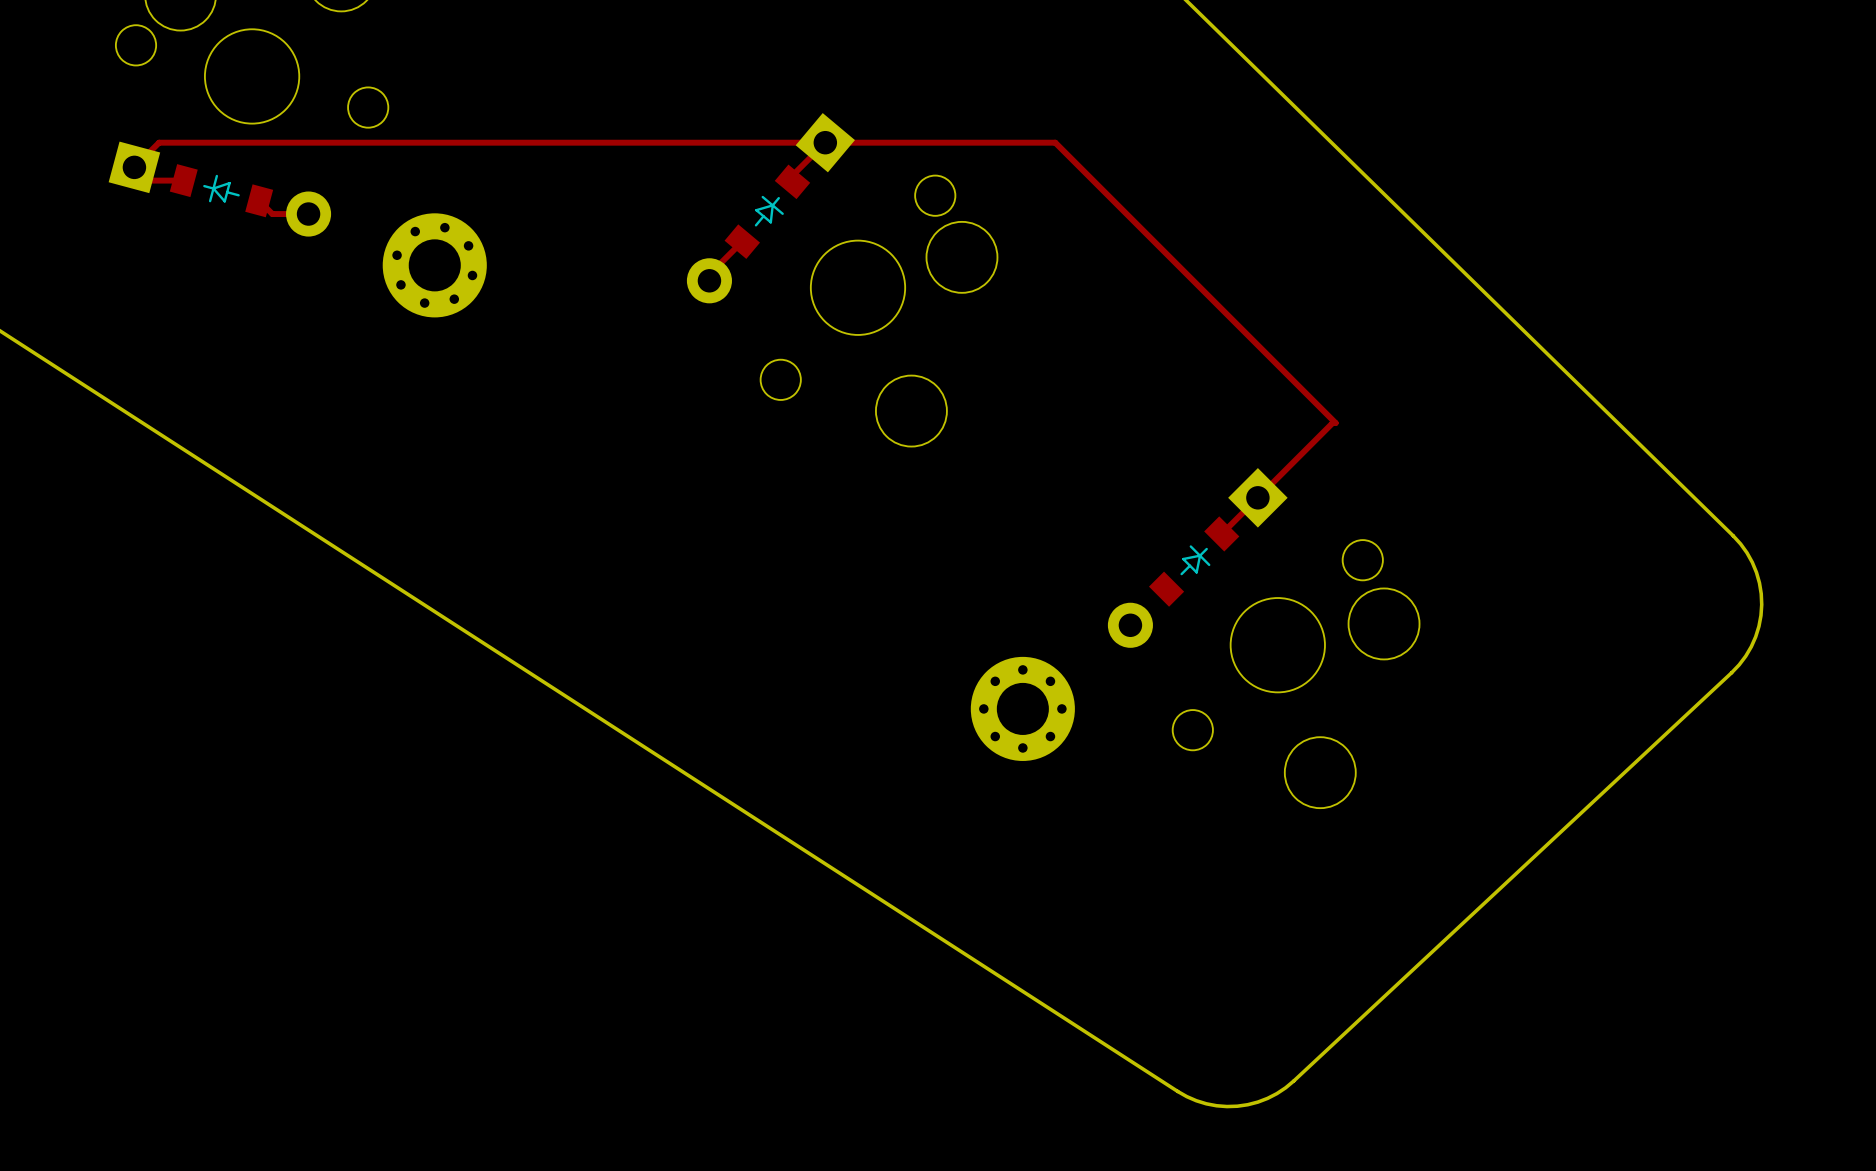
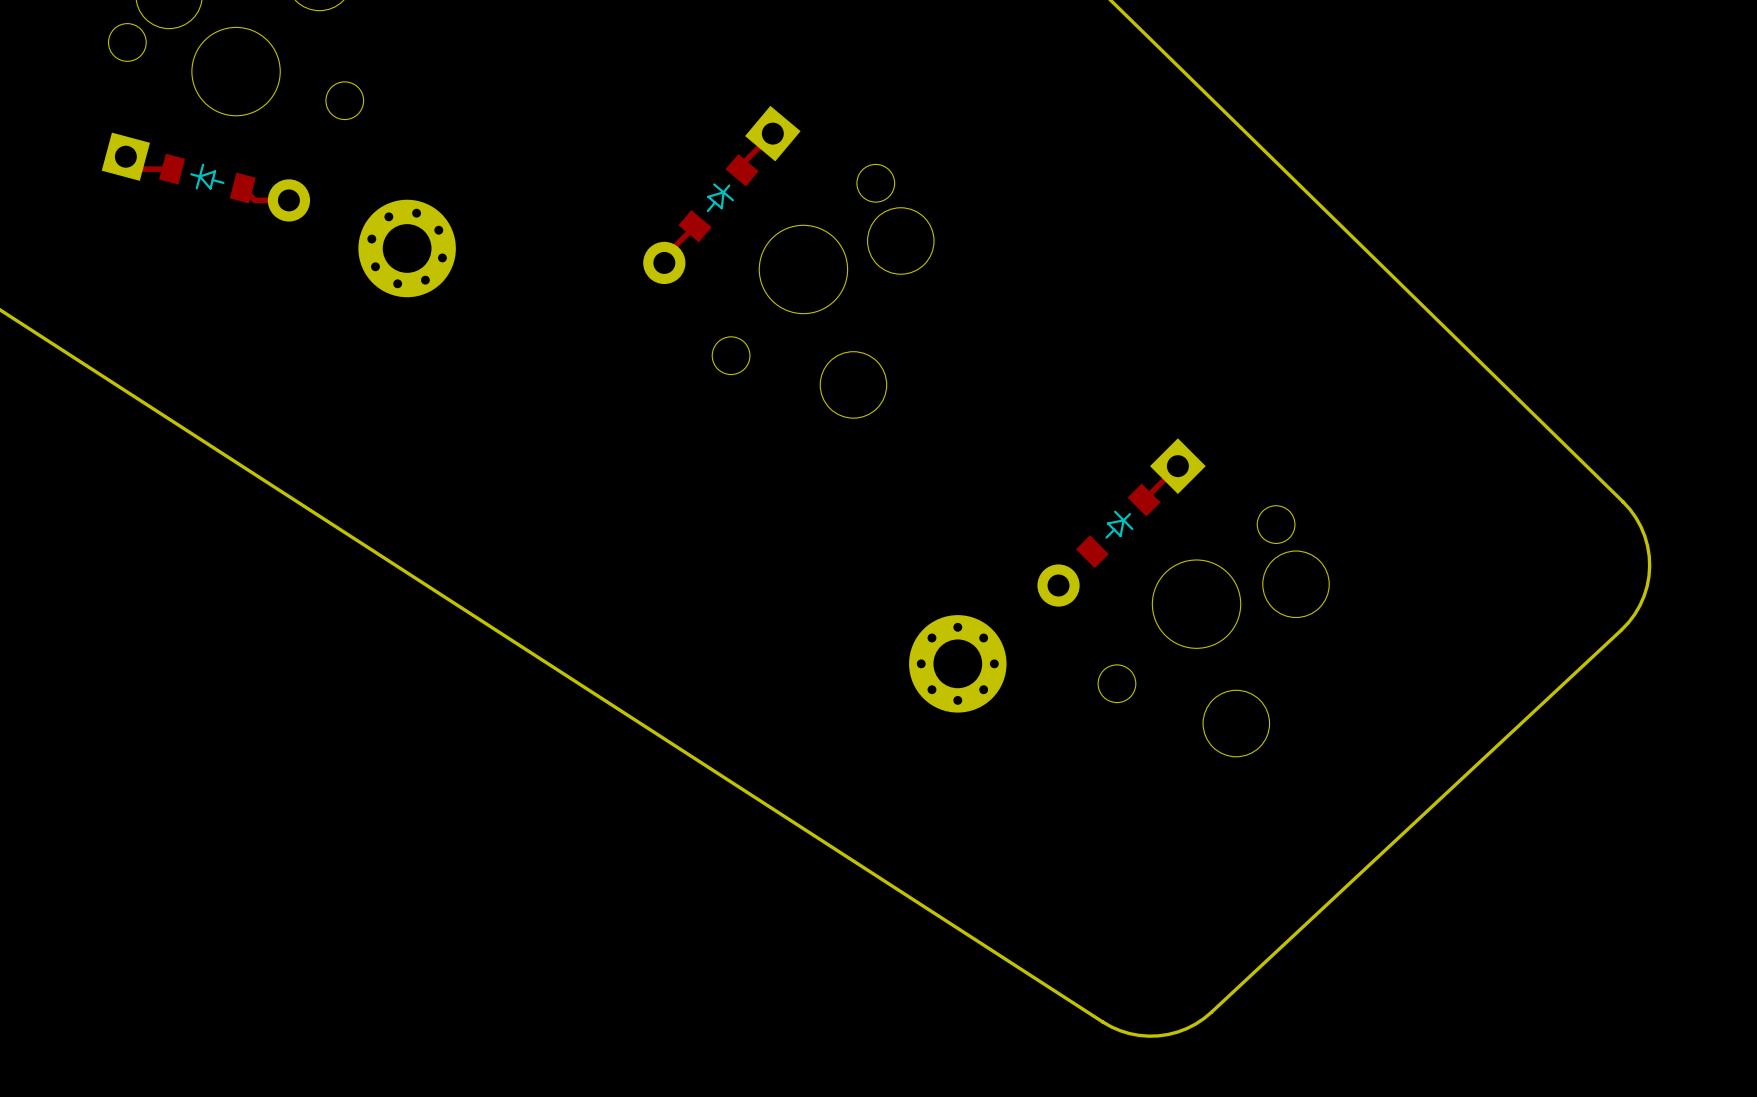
track: (134, 167) (159, 142) (1055, 142) (1335, 423) (1332, 423) (1257, 497) -> none

